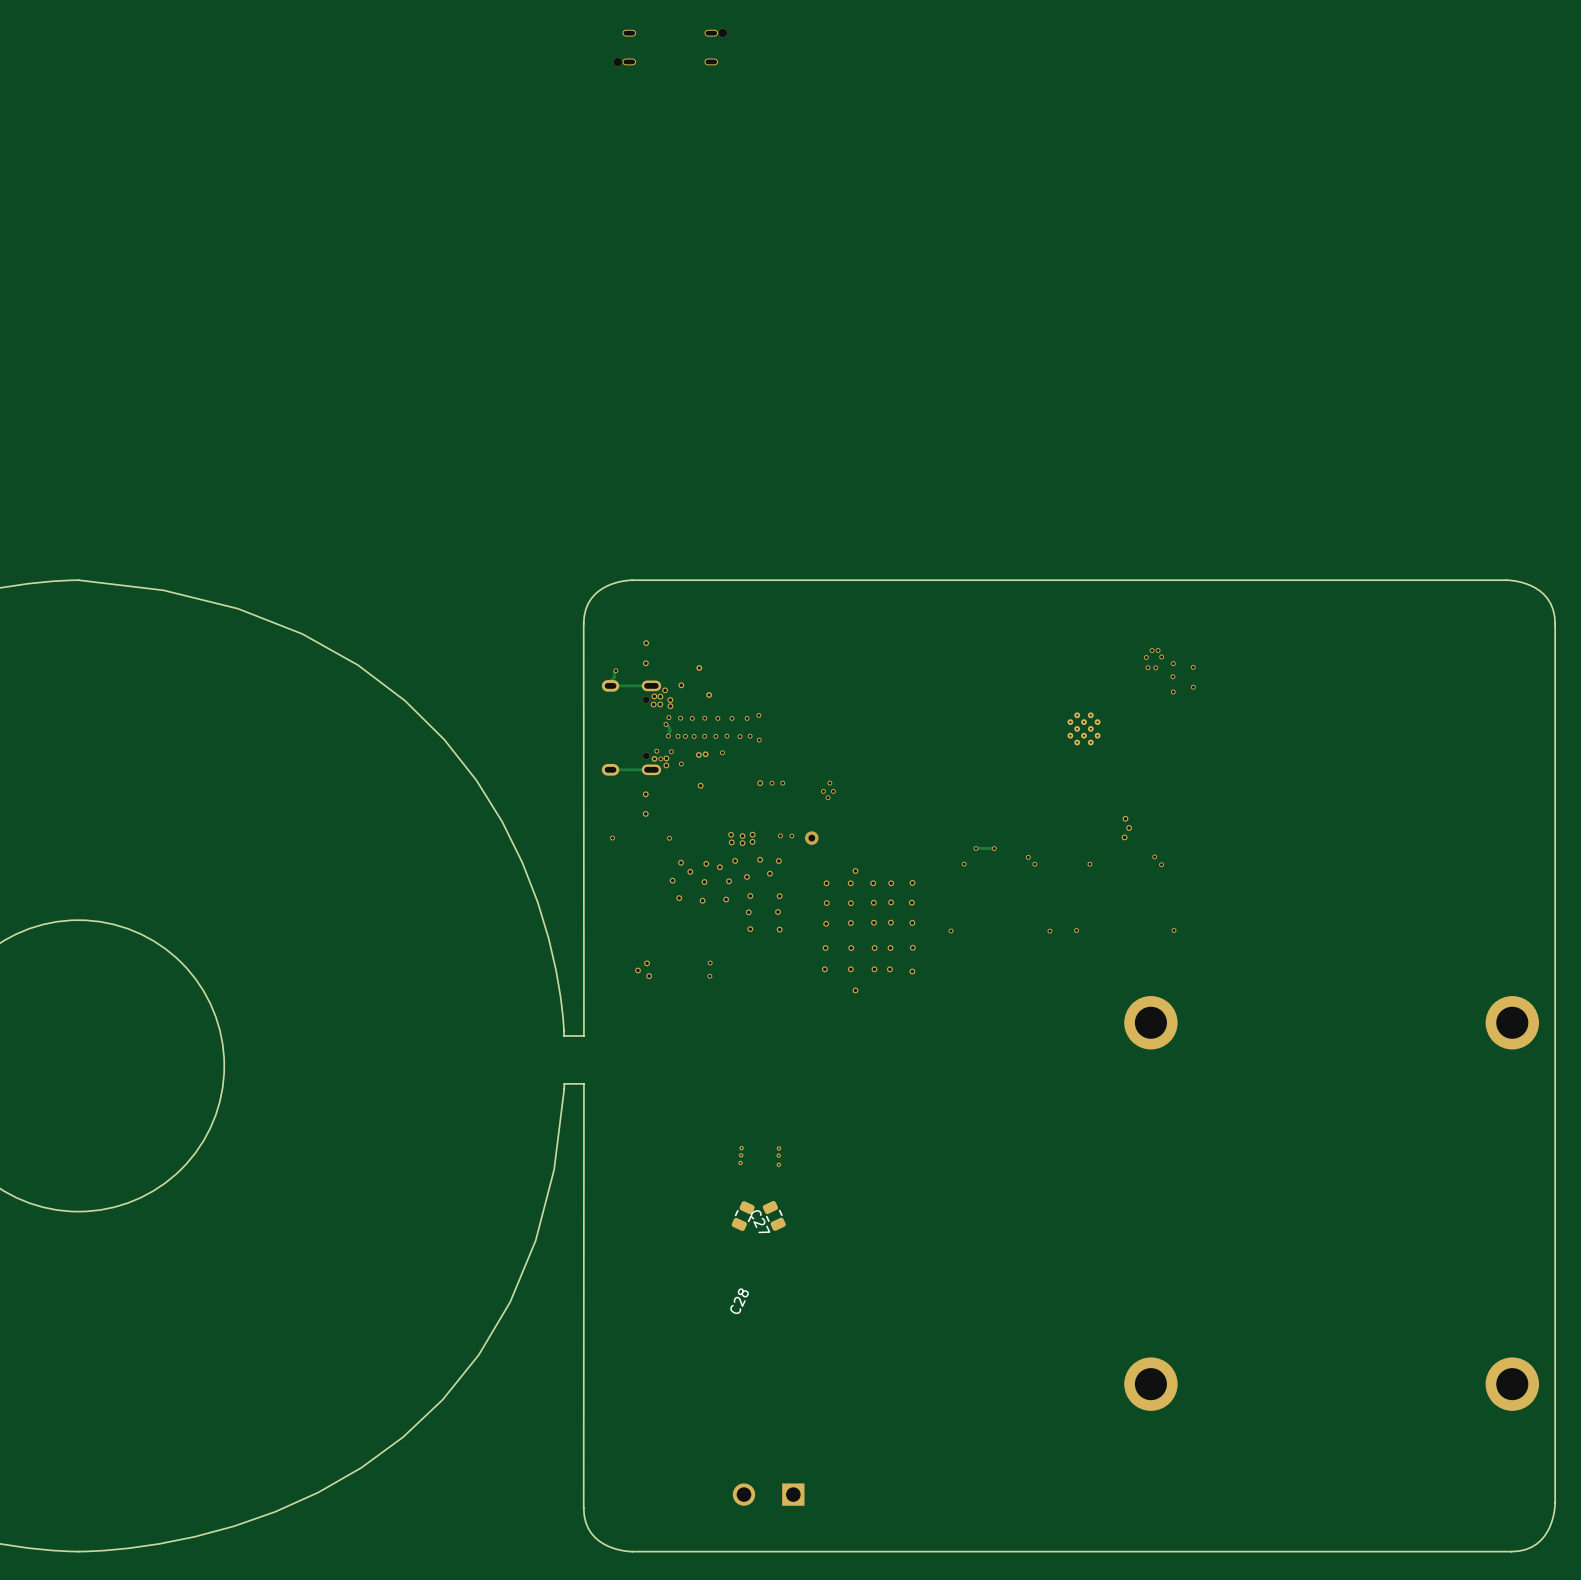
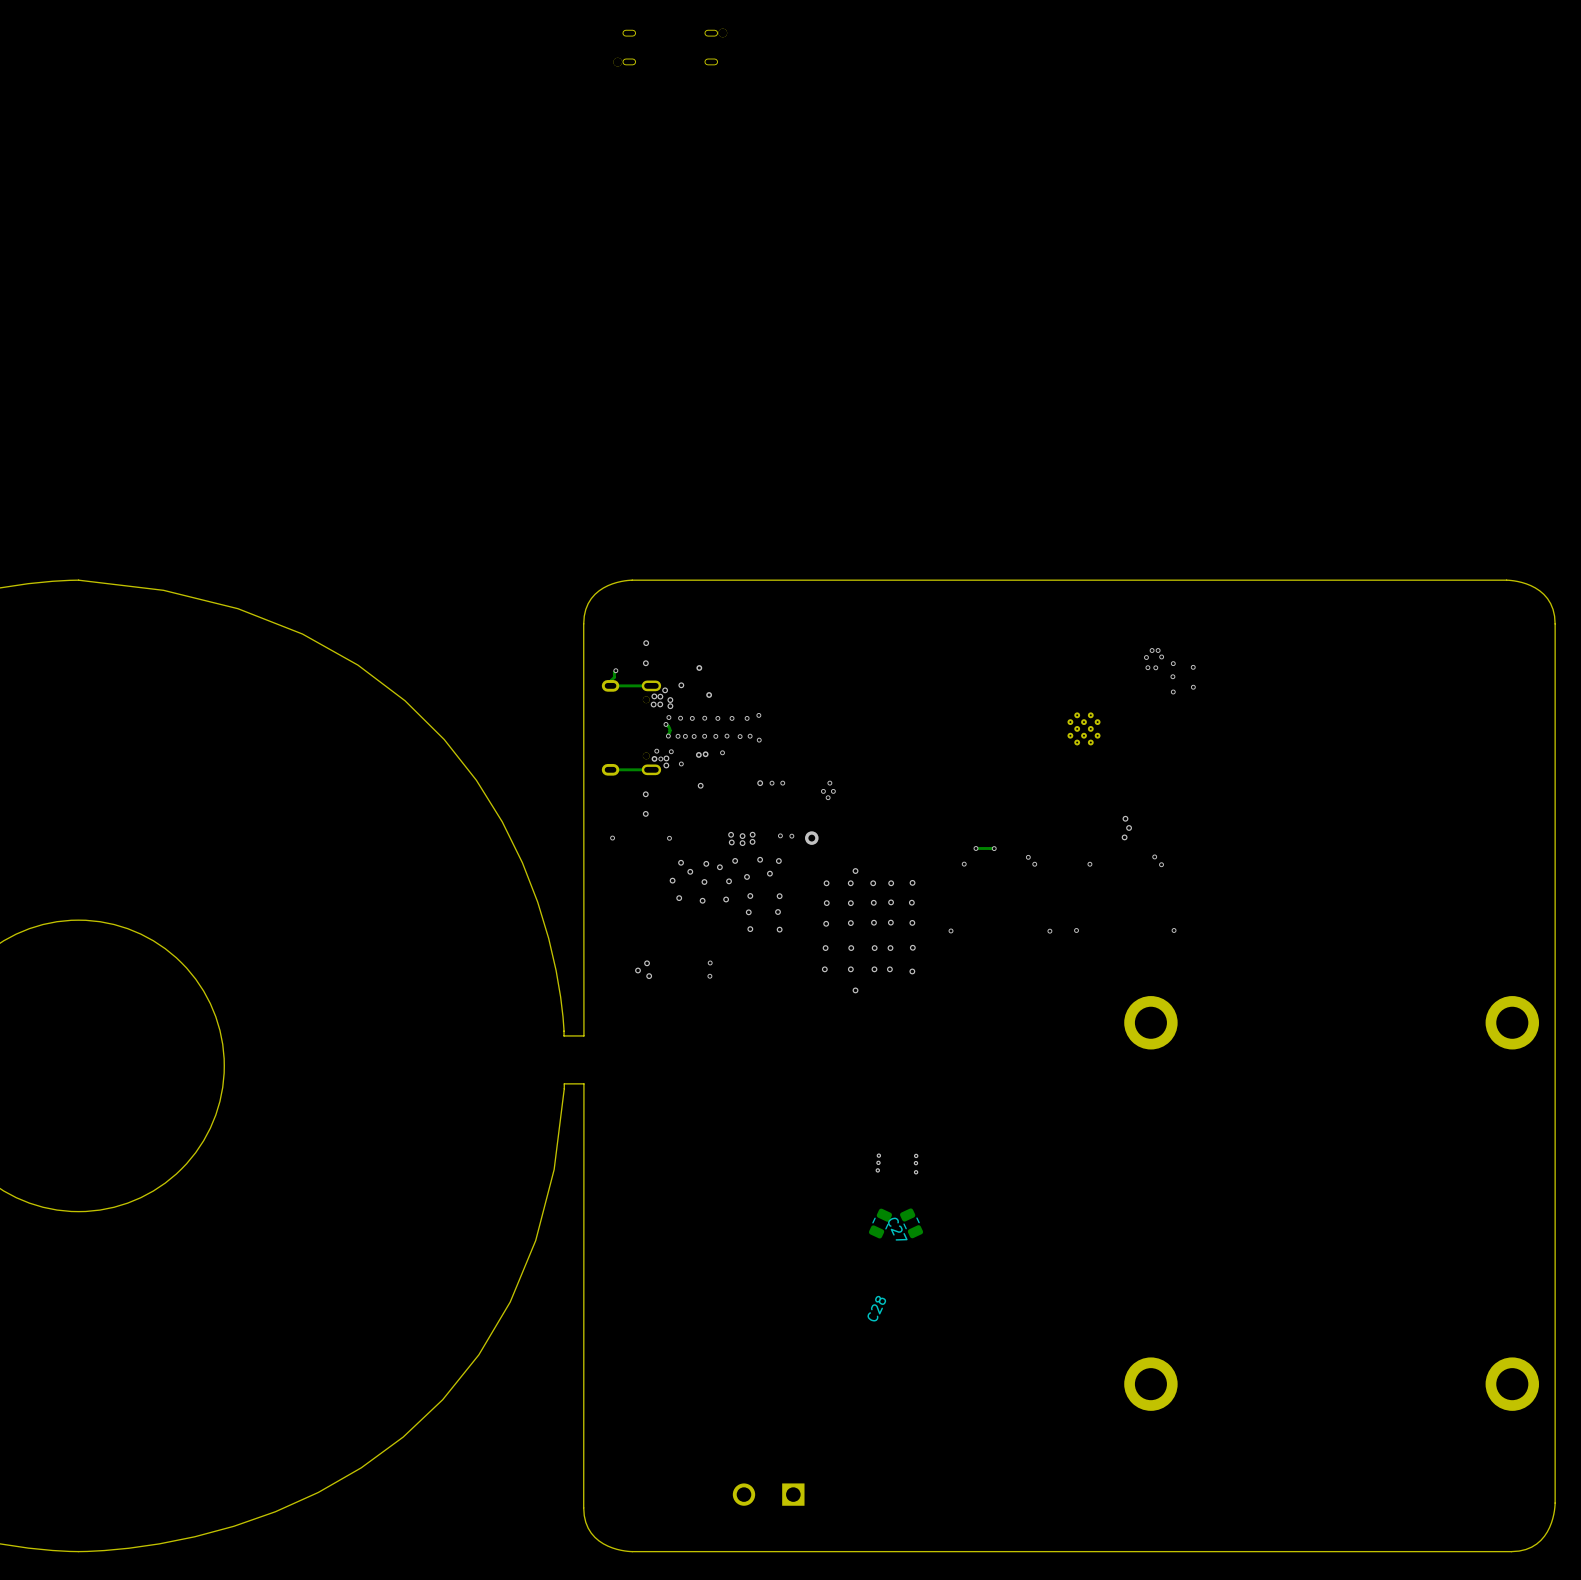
via: (741, 1148) -> none
via: (778, 1148) -> none
via: (741, 1155) -> none
via: (778, 1155) -> none
via: none -> (878, 1155)
via: none -> (916, 1155)
via: (740, 1162) -> none
via: none -> (878, 1162)
via: none -> (915, 1163)
via: (778, 1164) -> none
via: none -> (877, 1170)
via: none -> (916, 1172)
C27 position: (774, 1215) -> (911, 1223)
C28 position: (743, 1216) -> (880, 1223)

